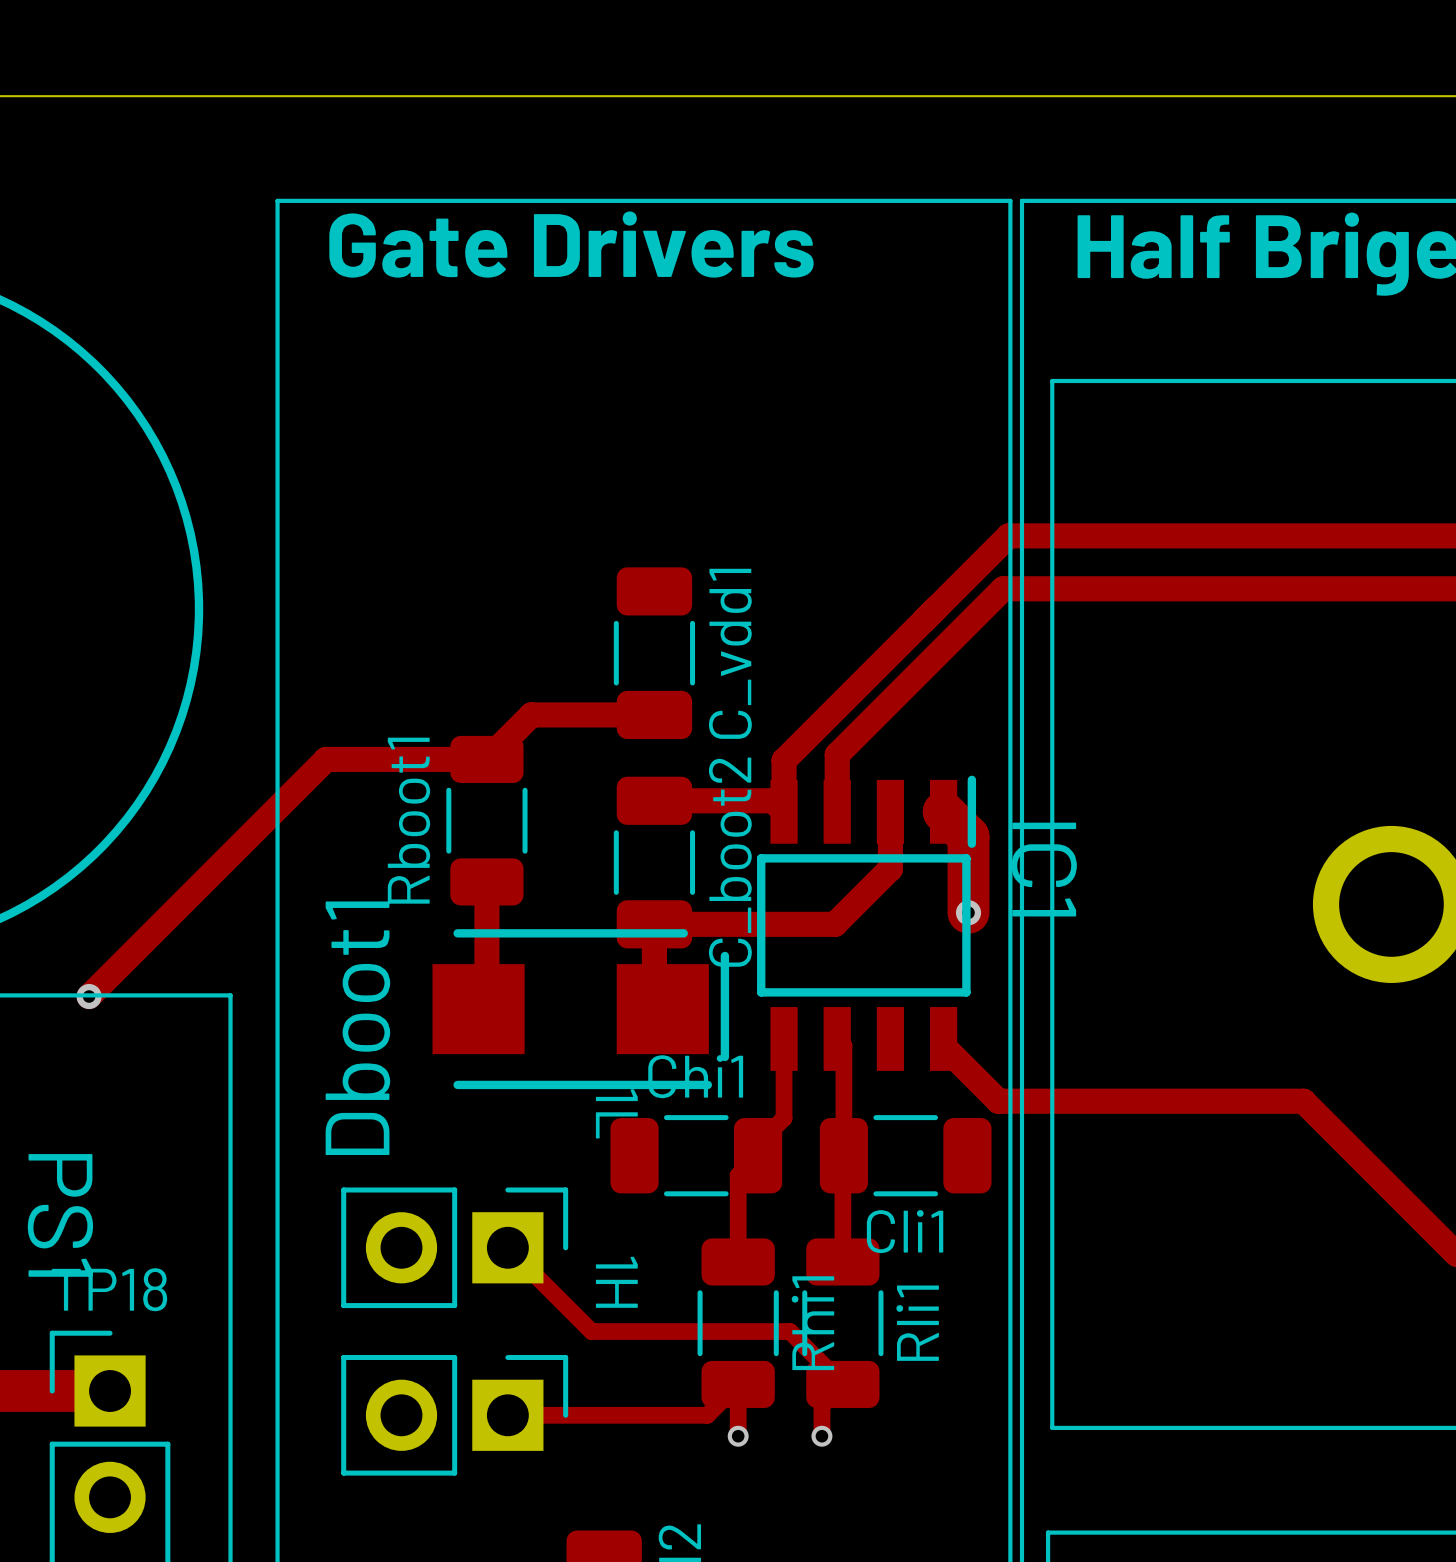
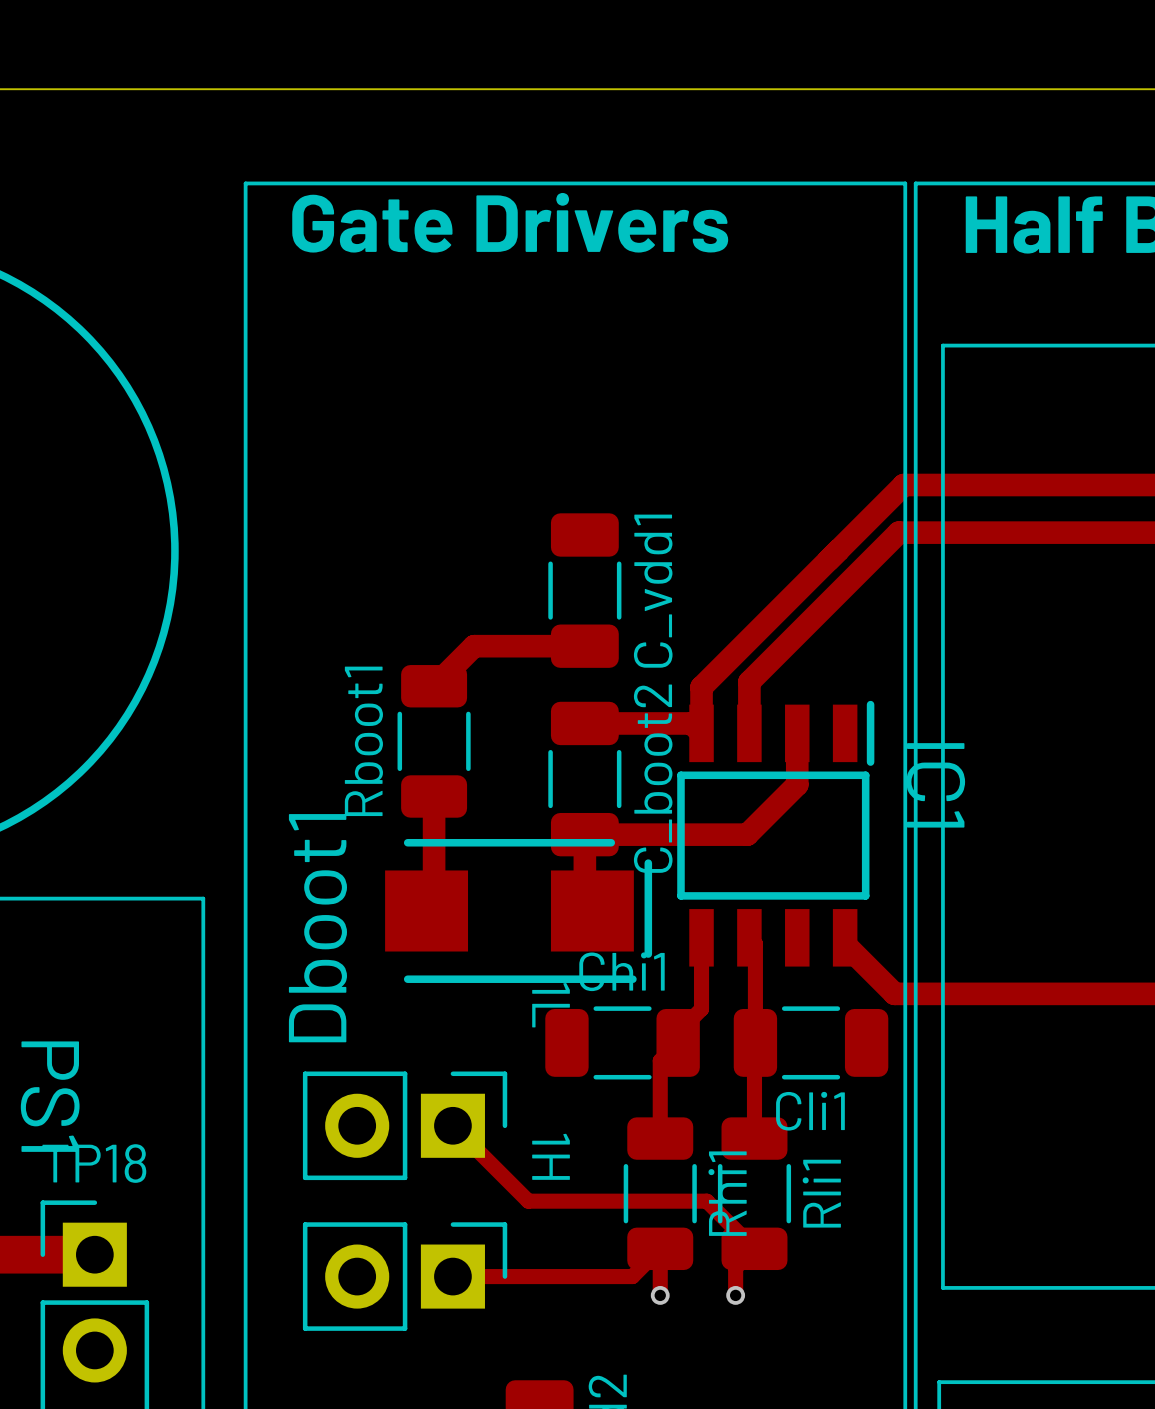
track: (486, 759) (326, 759) (89, 996) -> none
track: (943, 811) (968, 836) (968, 912) -> none
via: (968, 912) -> none
via: (89, 996) -> none

